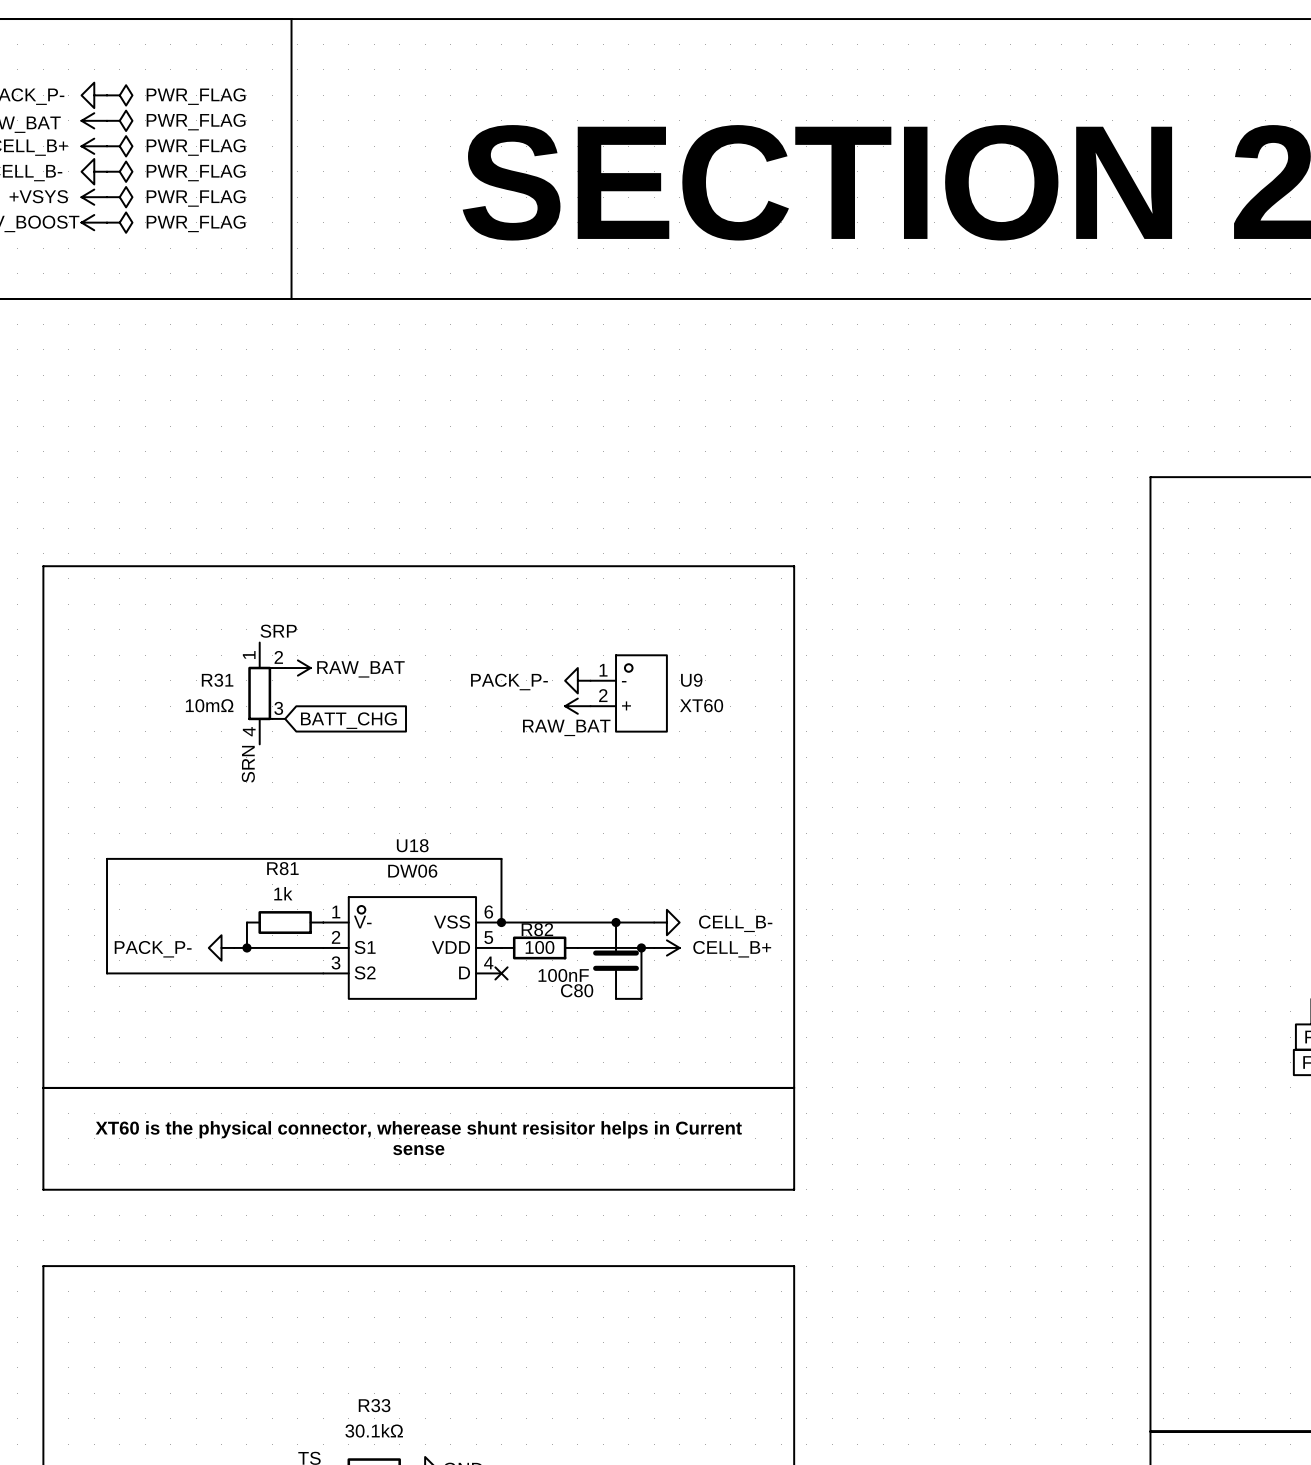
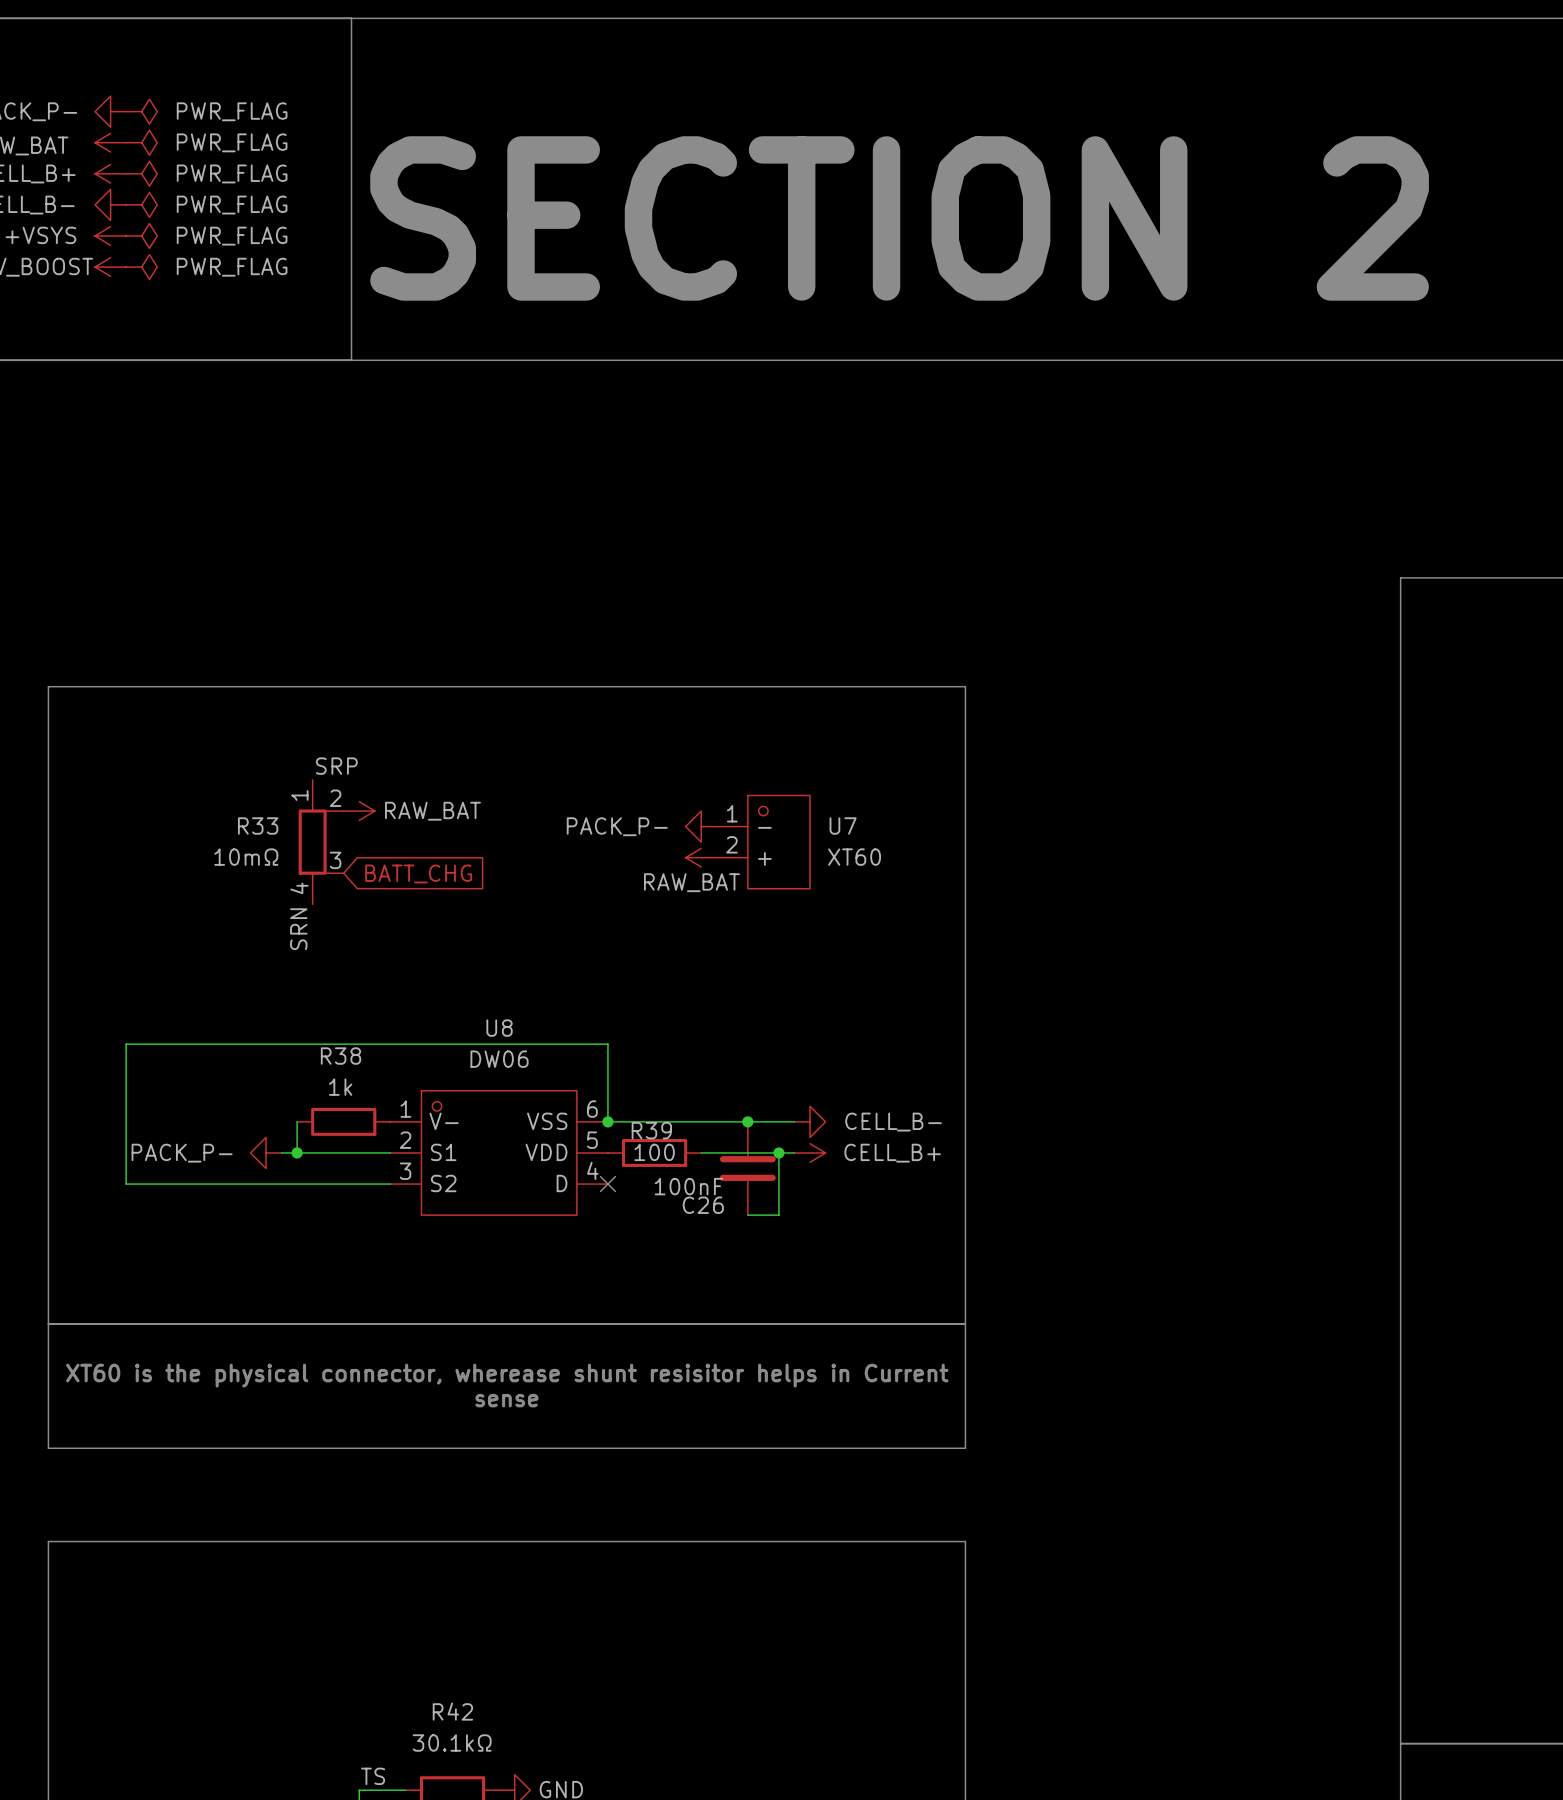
R31 name: R31 (217, 680) -> R33 (258, 826)
U9 name: U9 (691, 680) -> U7 (843, 826)
U18 name: U18 (412, 845) -> U8 (499, 1028)
R81 name: R81 (282, 868) -> R38 (341, 1056)
R82 name: R82 (537, 929) -> R39 (651, 1130)
C80 name: C80 (577, 990) -> C26 (703, 1205)
R33 name: R33 (374, 1405) -> R42 (452, 1711)

